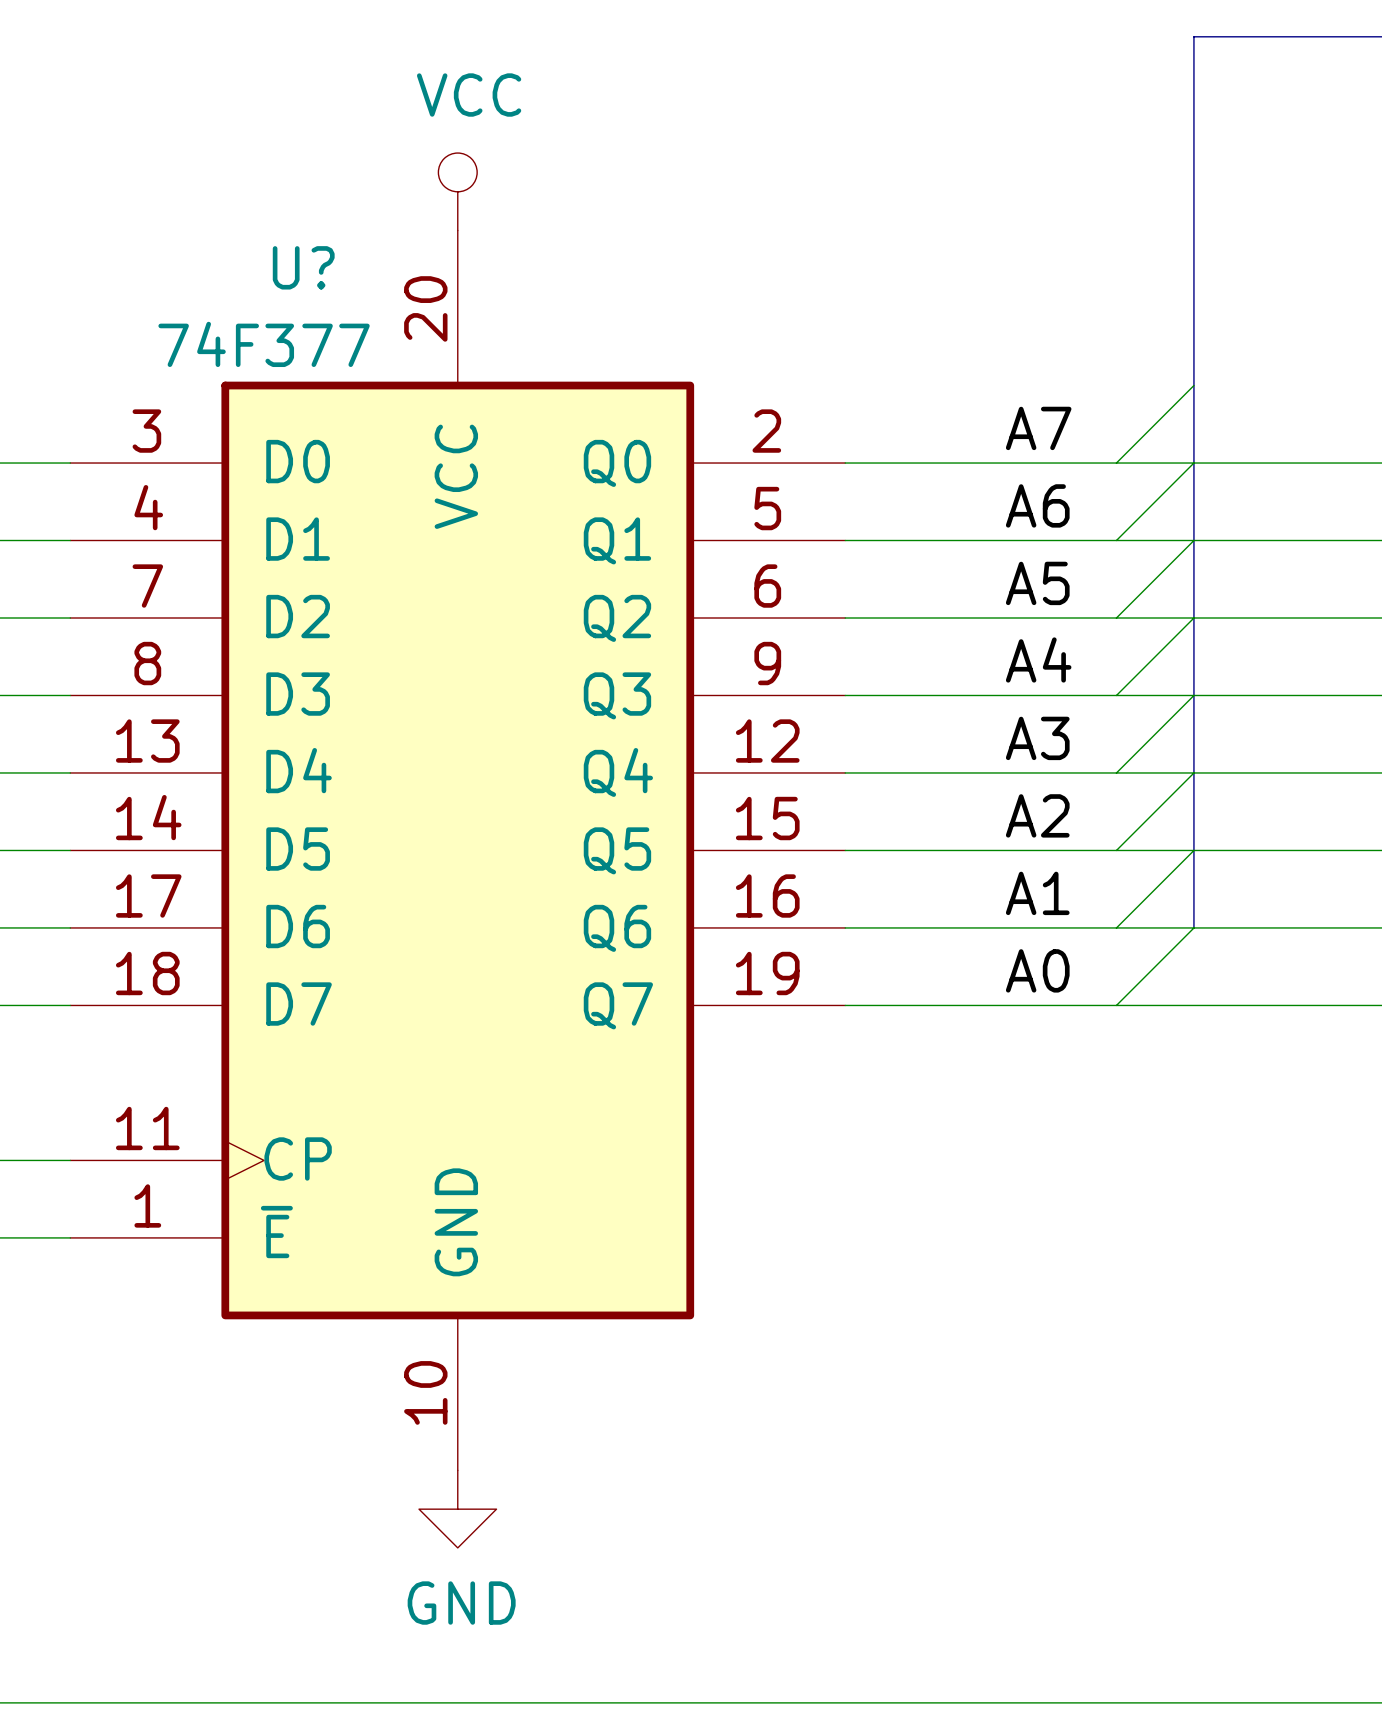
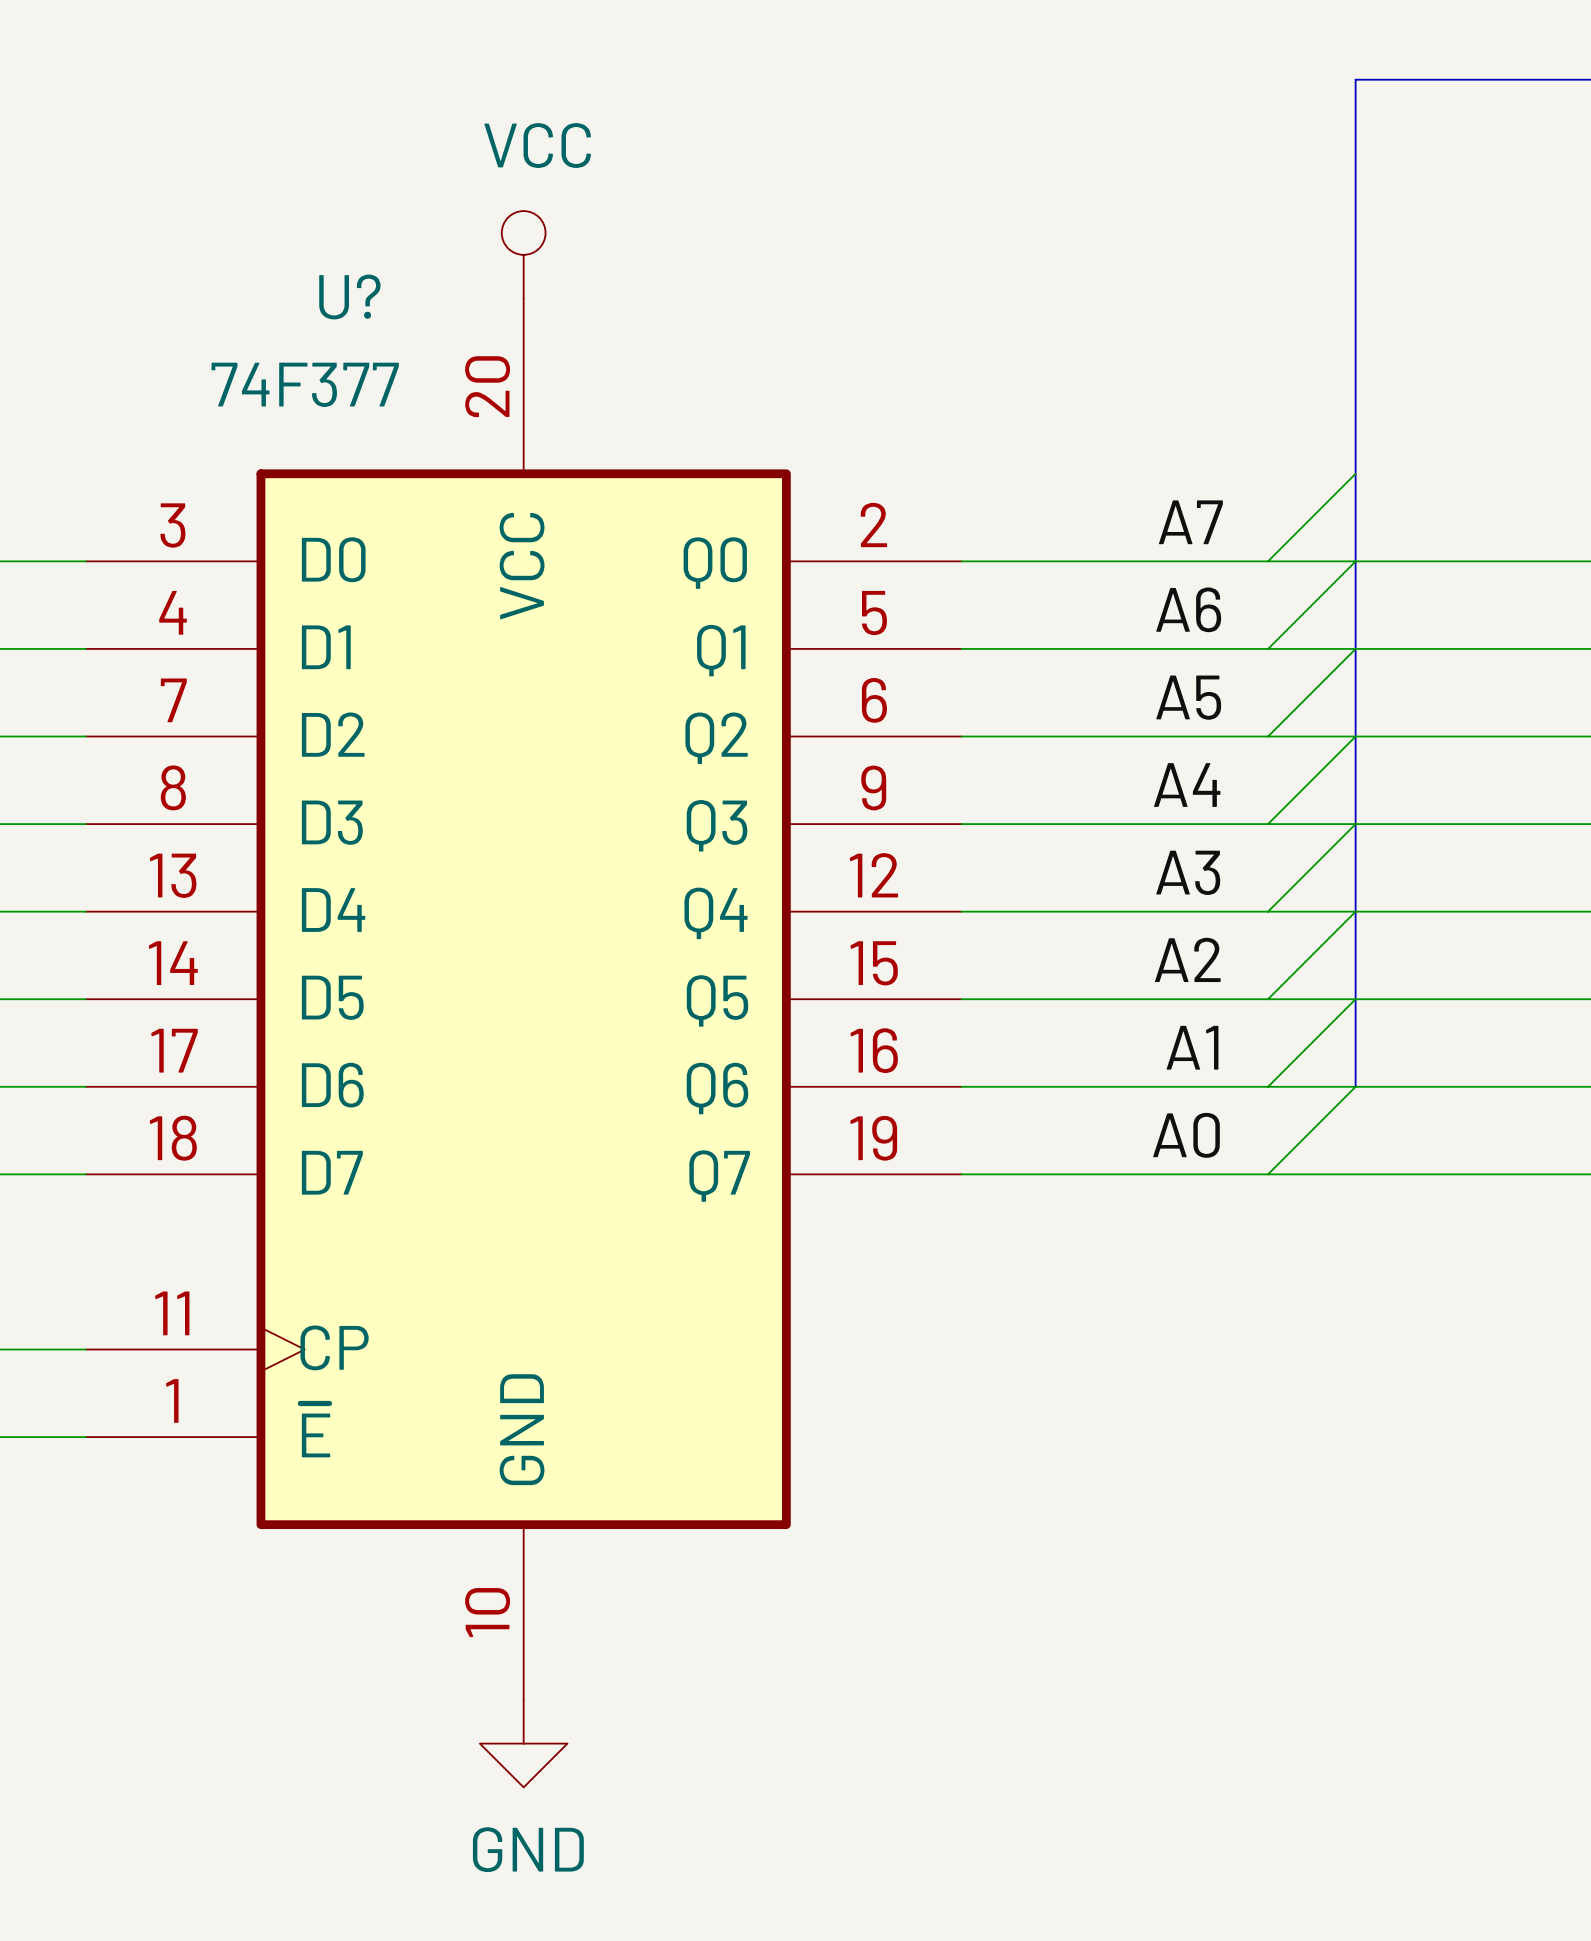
U? name position: U? (303, 267) -> U? (349, 296)
U? value position: 74F377 (264, 344) -> 74F377 (305, 384)

